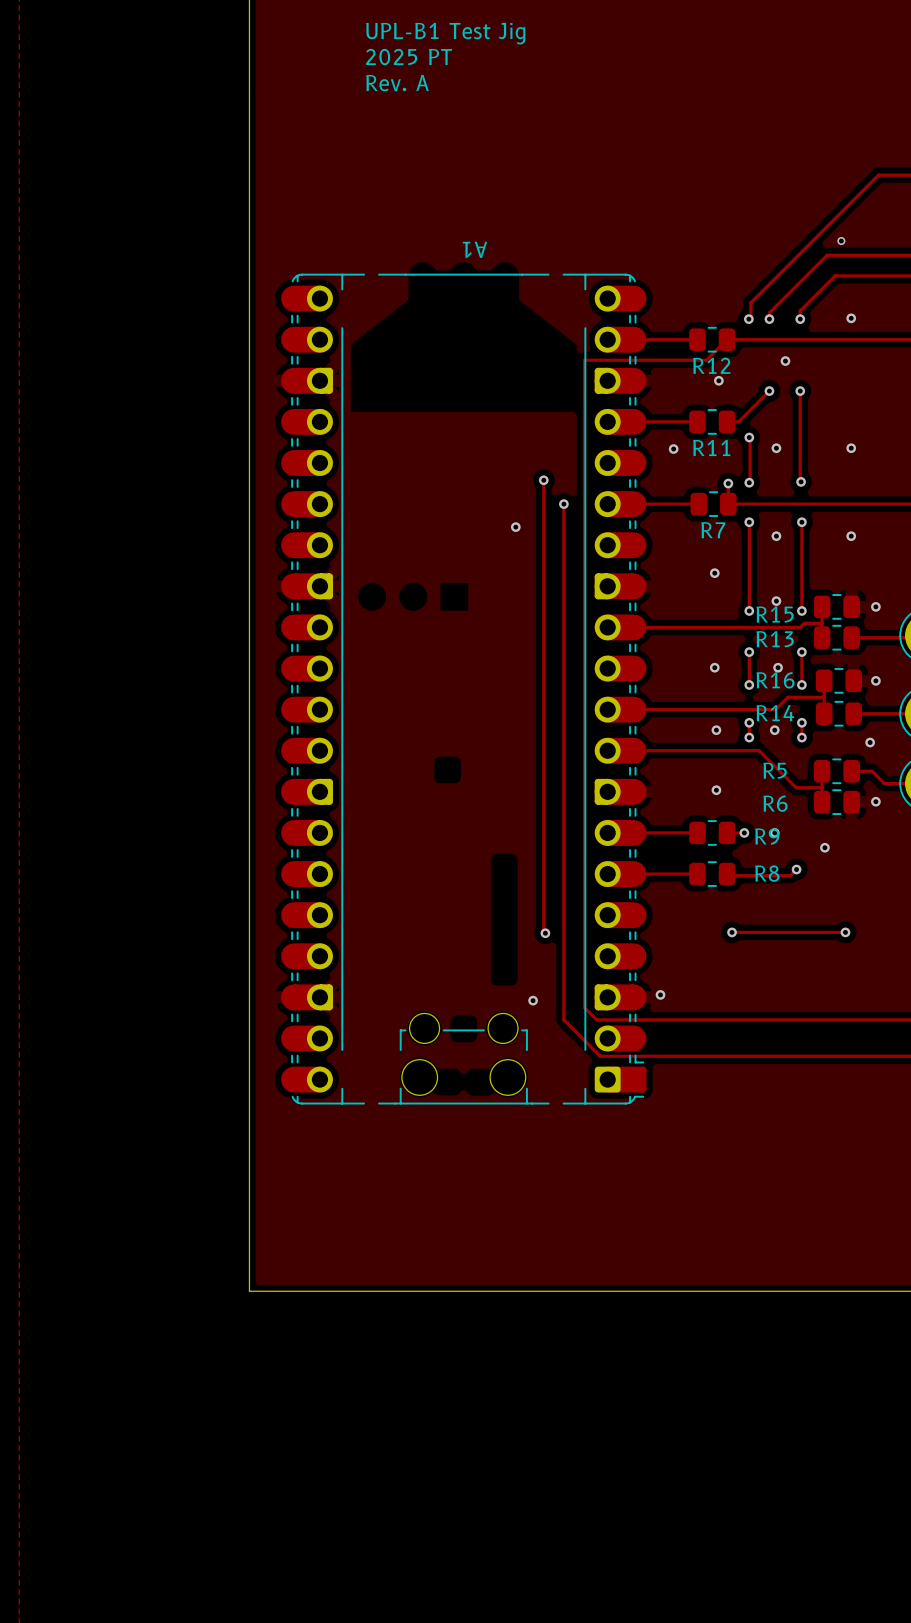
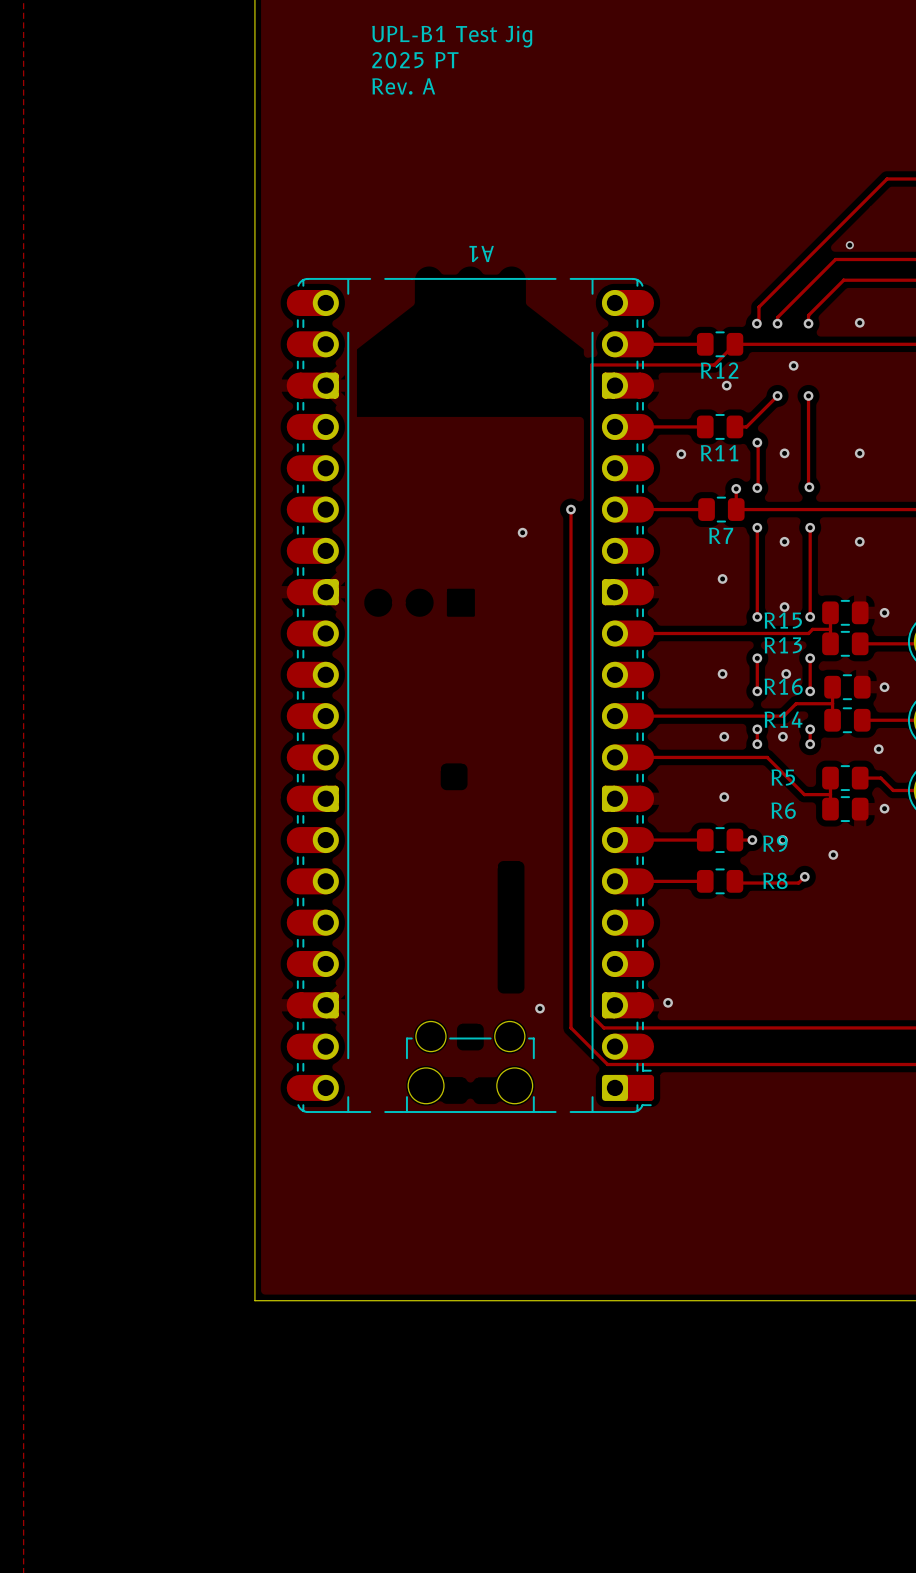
track: (543, 480) (543, 931) (545, 933) -> none
via: (543, 480) -> none
track: (732, 932) (847, 932) -> none
via: (732, 932) -> none
via: (845, 932) -> none
via: (545, 933) -> none

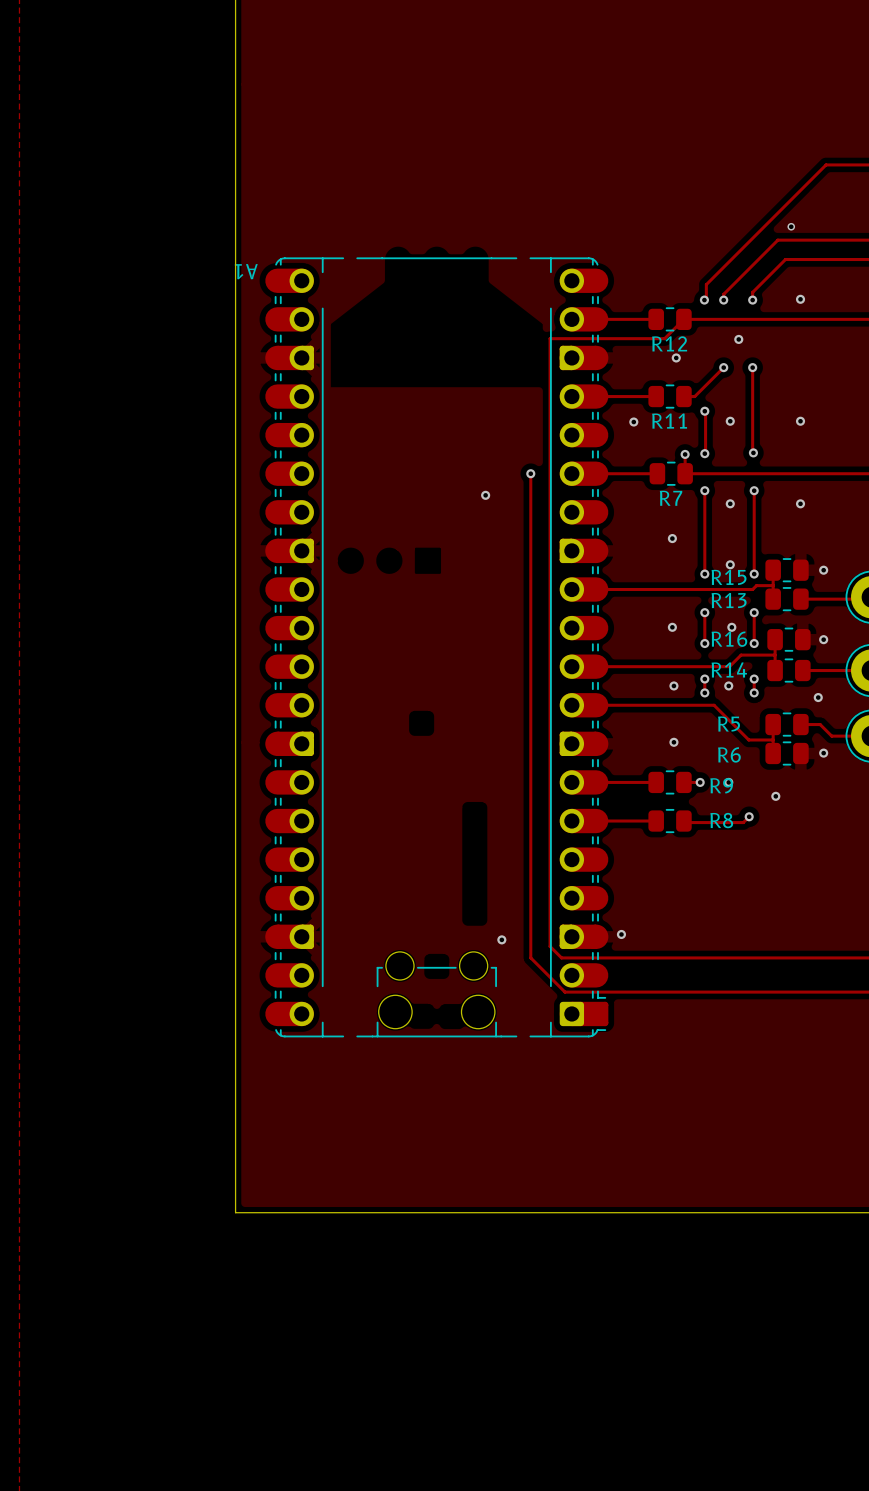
text: UPL-B1 Test Jig (452, 36) -> none
text: 2025 PT (415, 60) -> none
text: Rev. A (403, 86) -> none
A1 name position: A1 (481, 254) -> A1 (246, 271)

